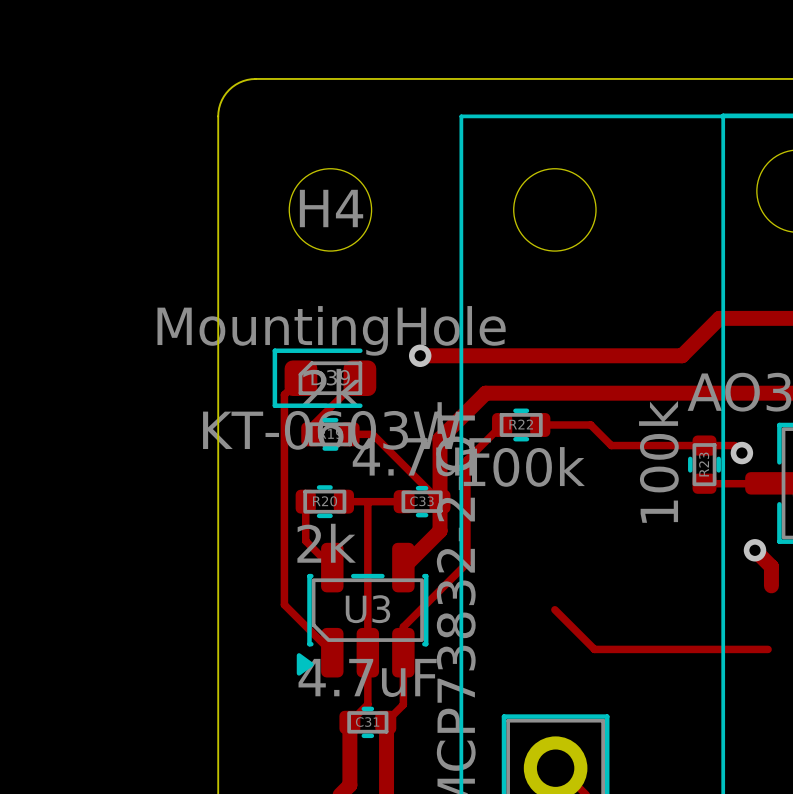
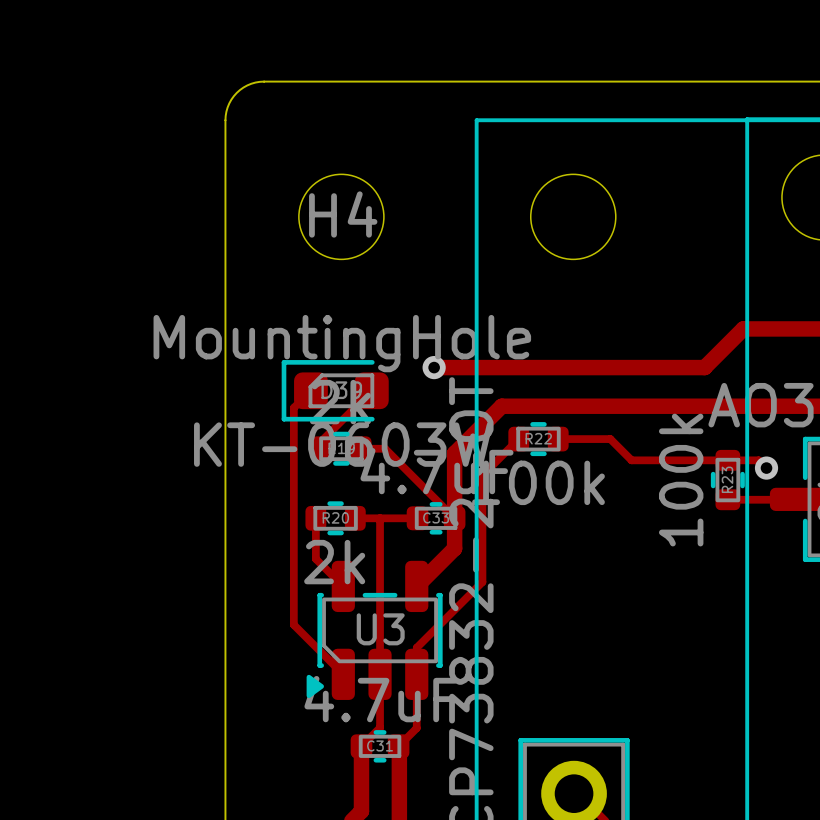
track: (754, 550) (771, 566) (771, 585) -> none
via: (754, 550) -> none
track: (554, 609) (594, 649) (768, 649) -> none

